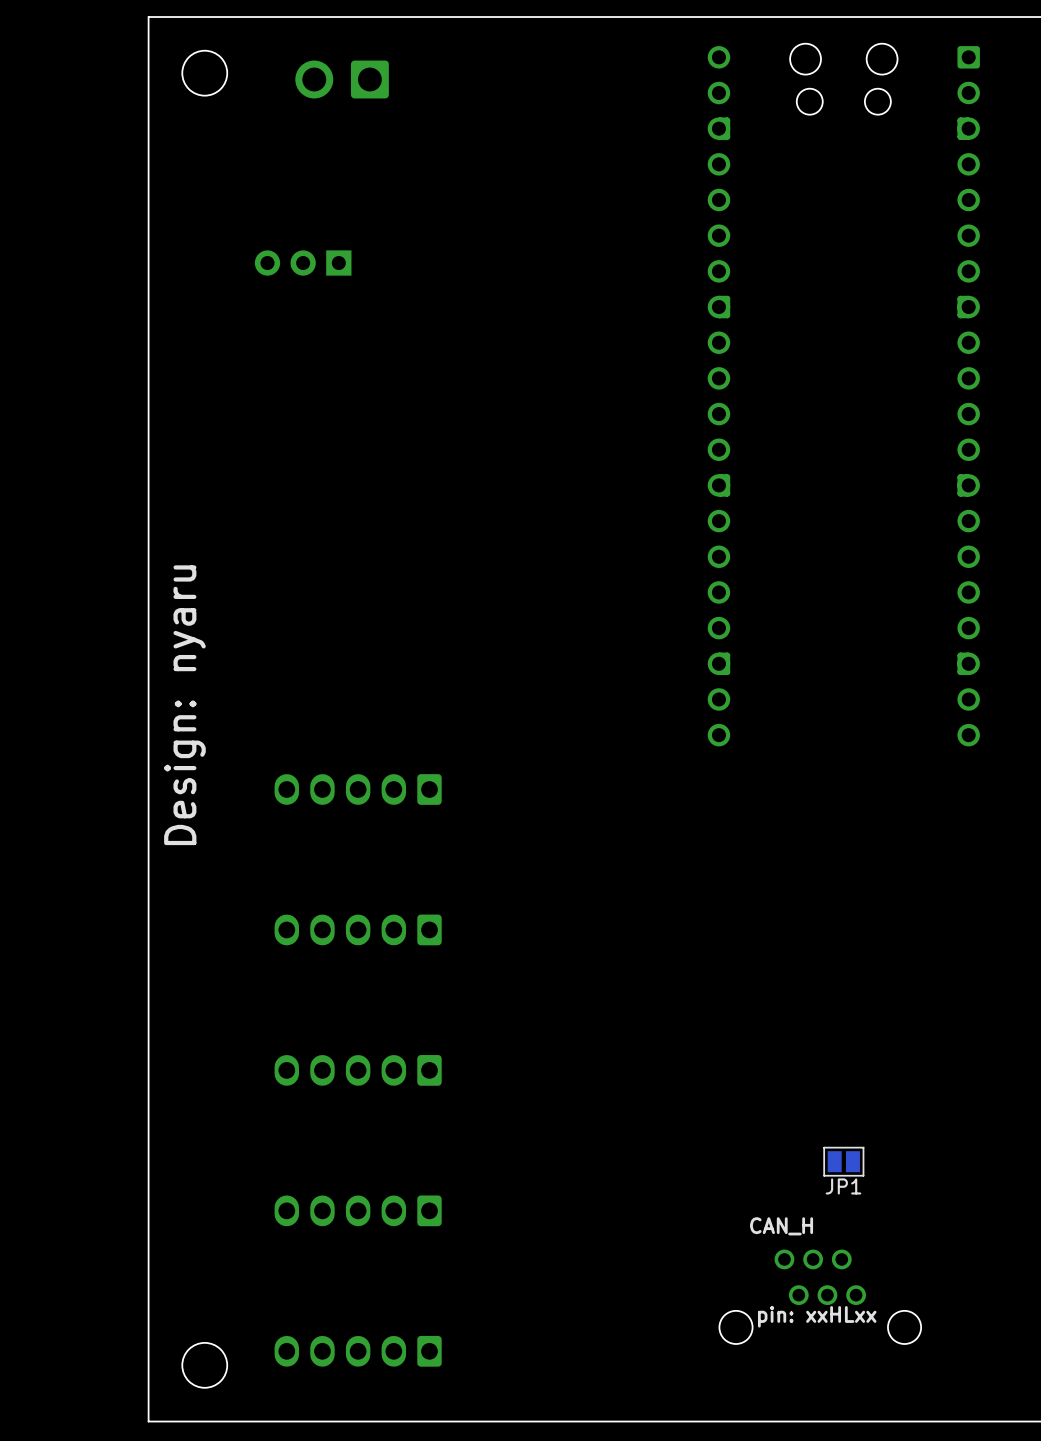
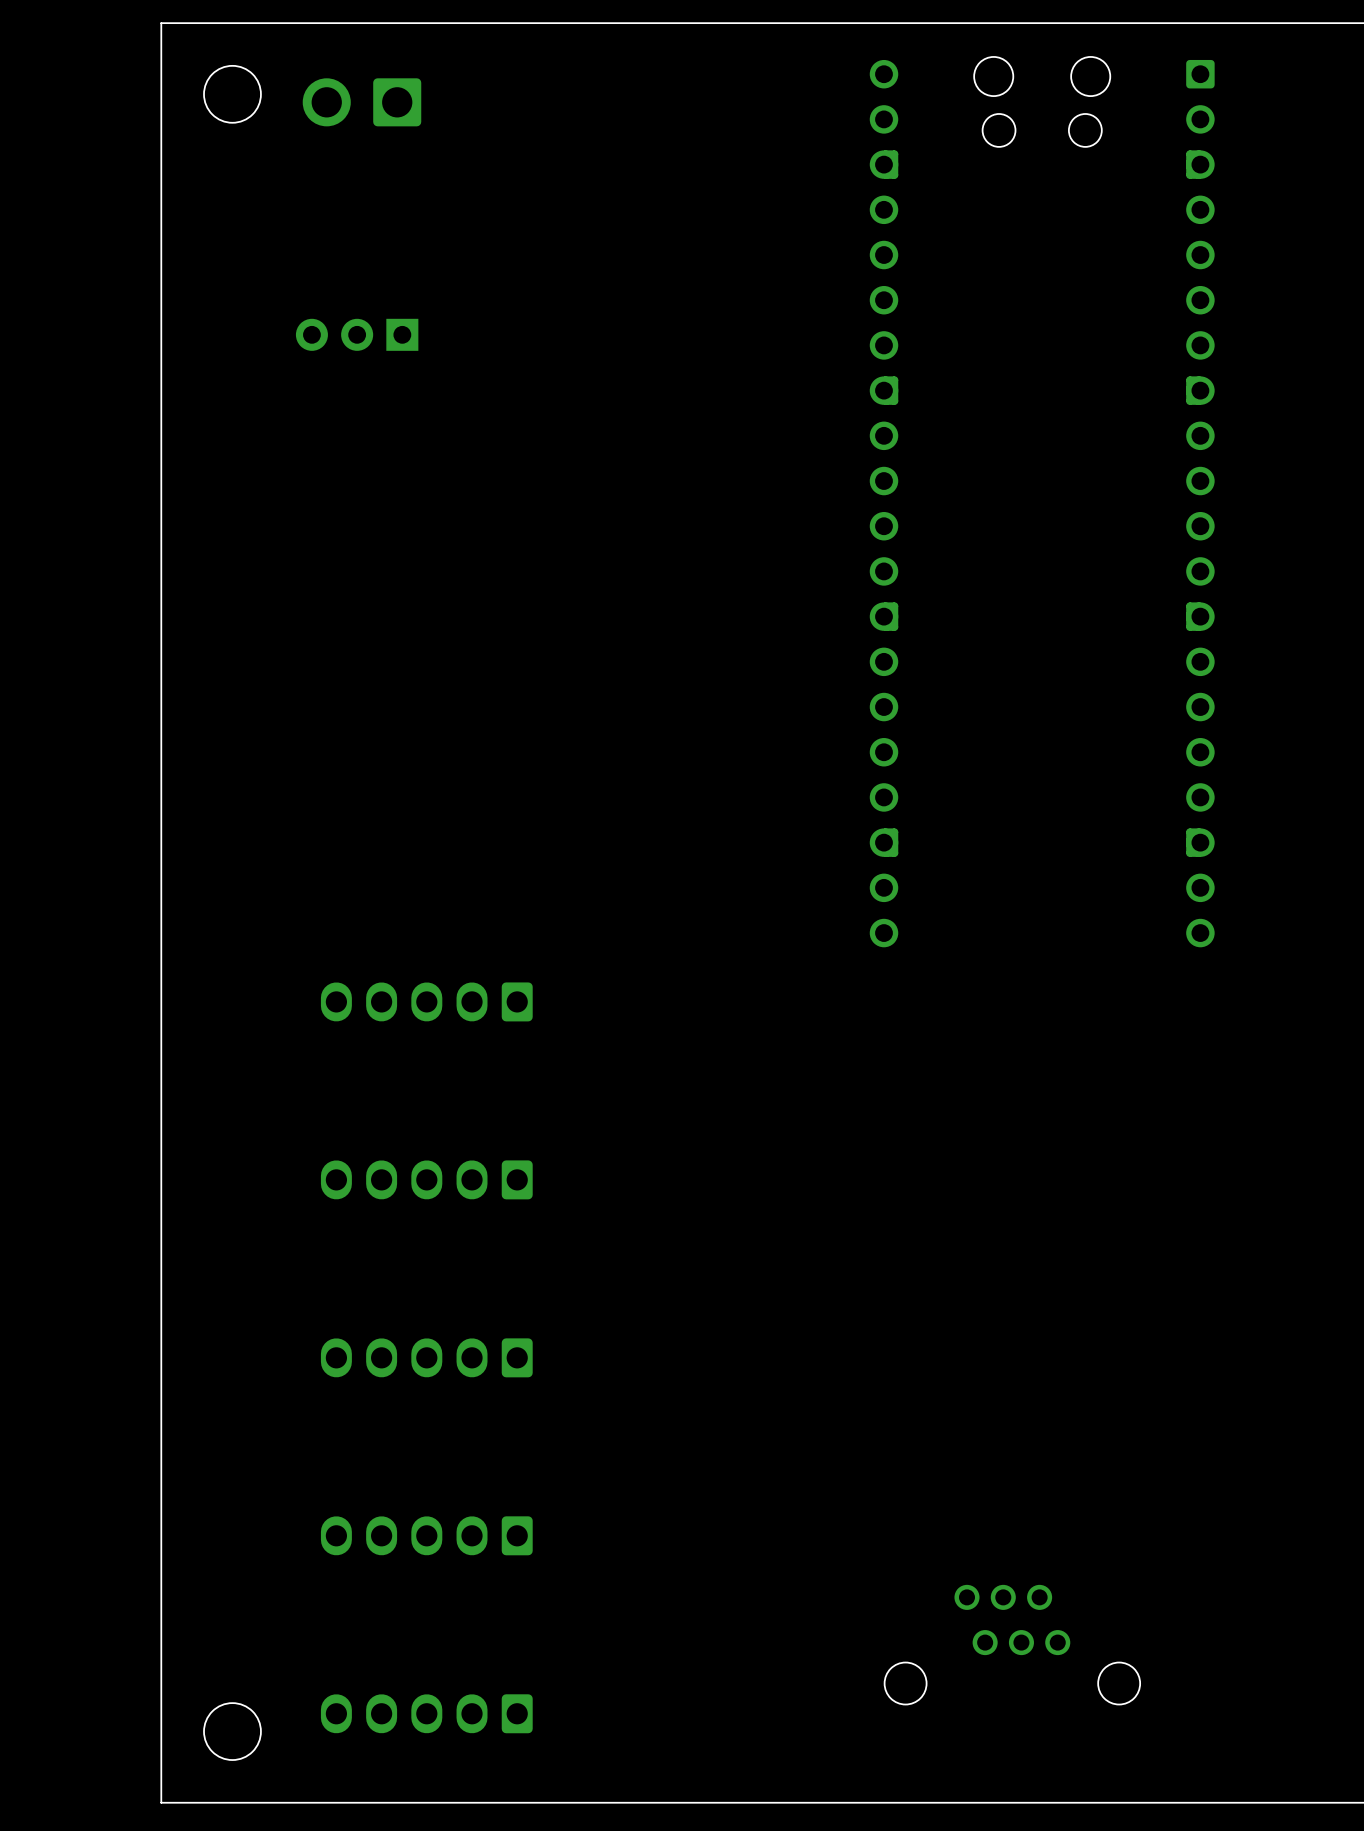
part position: (342, 79) -> (361, 102)
text: Design: nyaru (184, 705) -> none
JP1: (843, 1161) -> none
text: CAN_H (781, 1226) -> none
text: pin: xxHLxx (817, 1316) -> none

